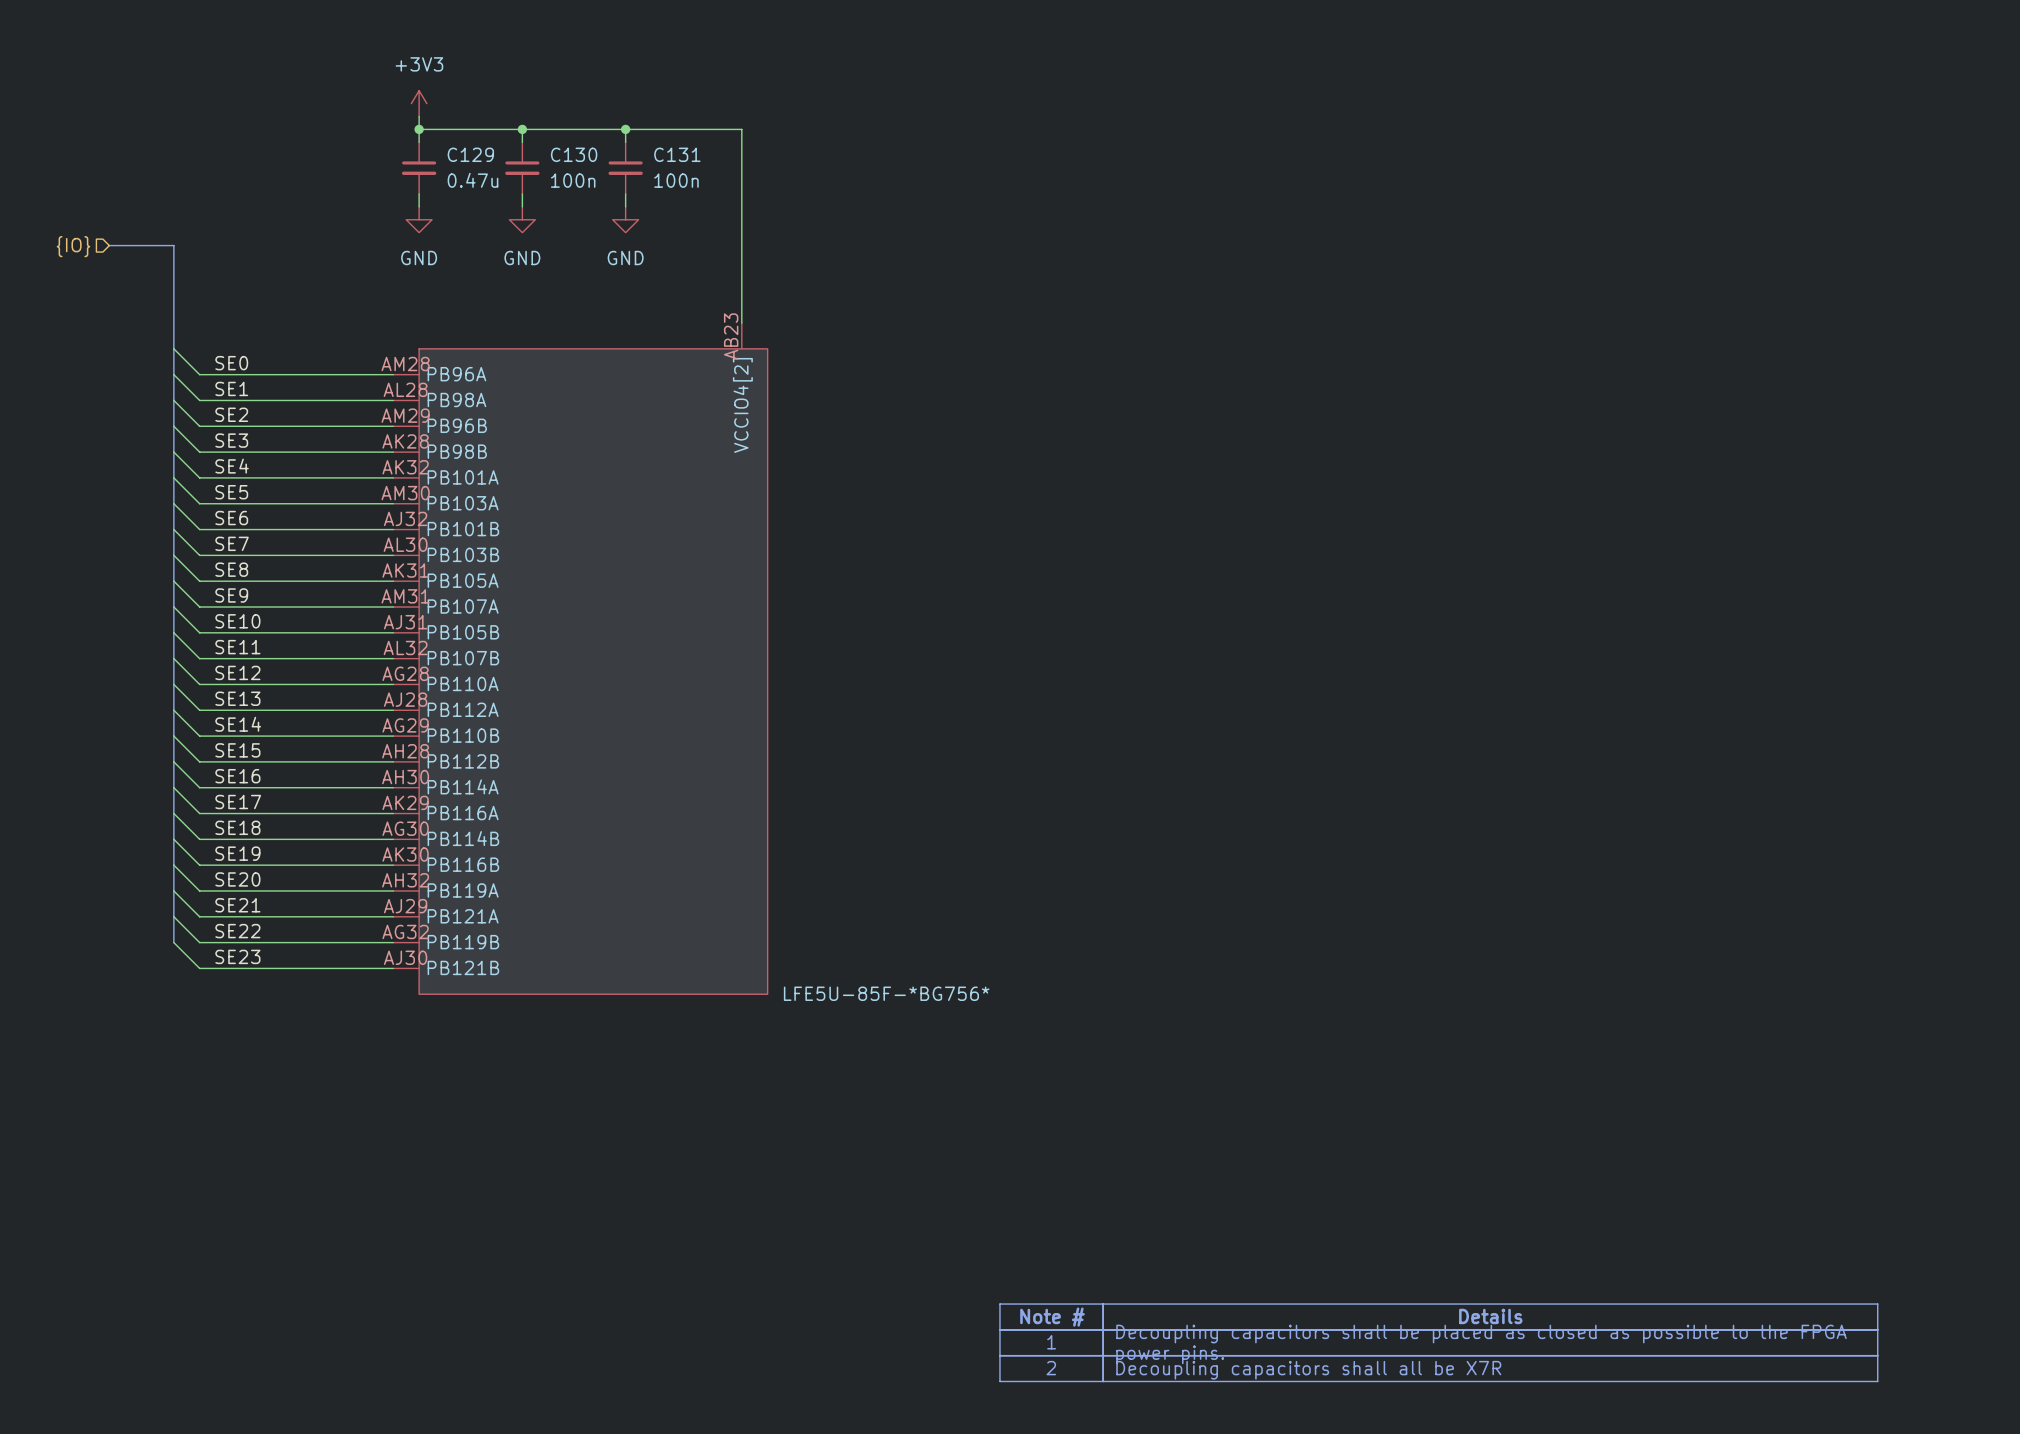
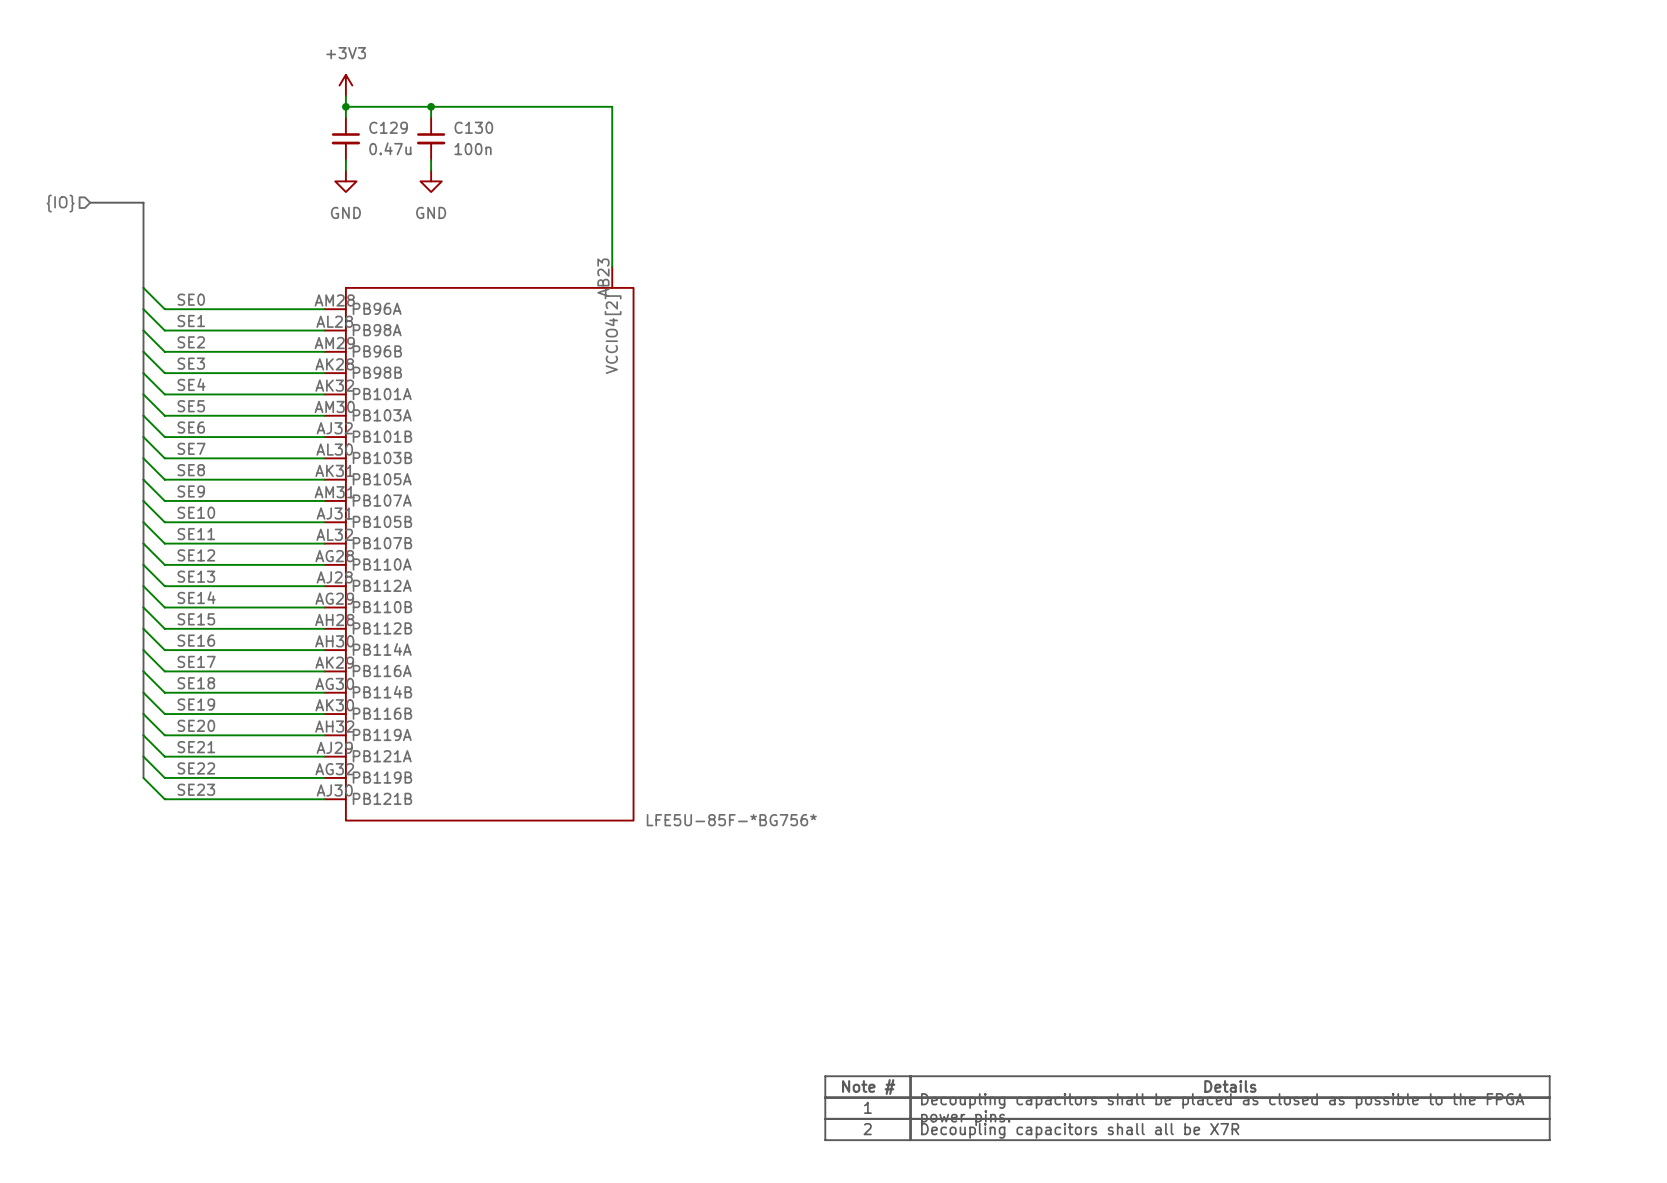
wire: (625, 129) (625, 142) -> none
junction: (625, 129) -> none
C131: 100n (625, 168) -> none
wire: (625, 193) (625, 206) -> none
power symbol: GND (625, 219) -> none

